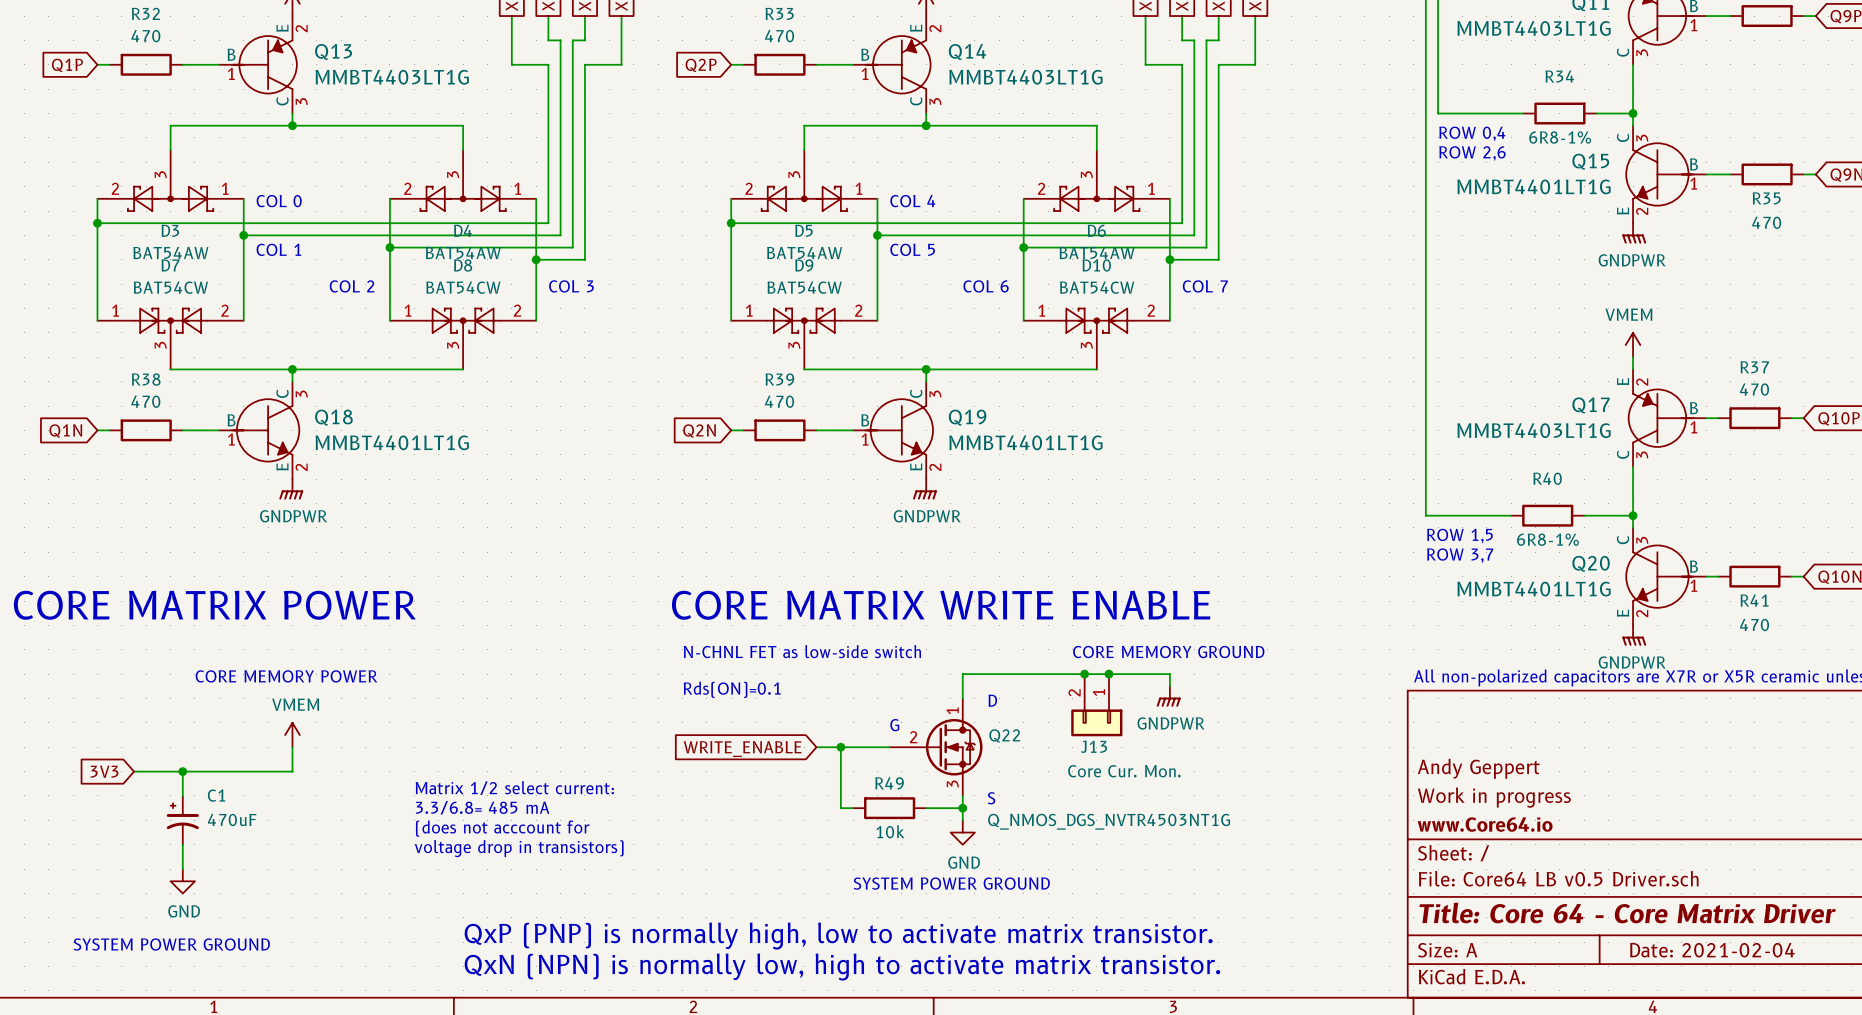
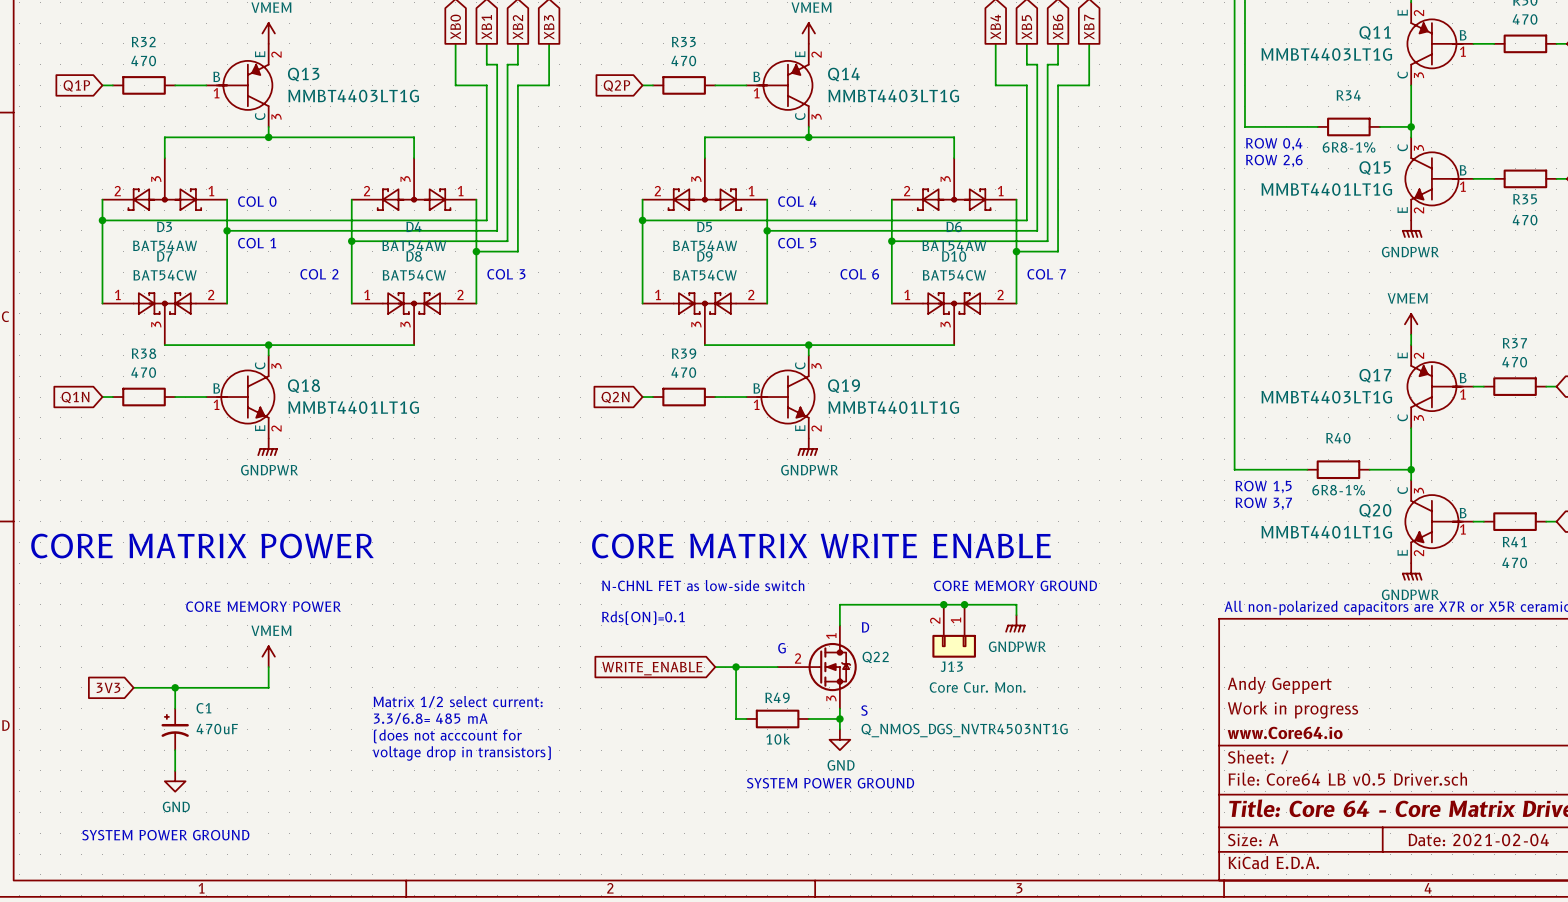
text: QxP (PNP) is normally high, low to activate matrix transistor. (838, 936) -> none
text: QxN (NPN) is normally low, high to activate matrix transistor. (842, 967) -> none

